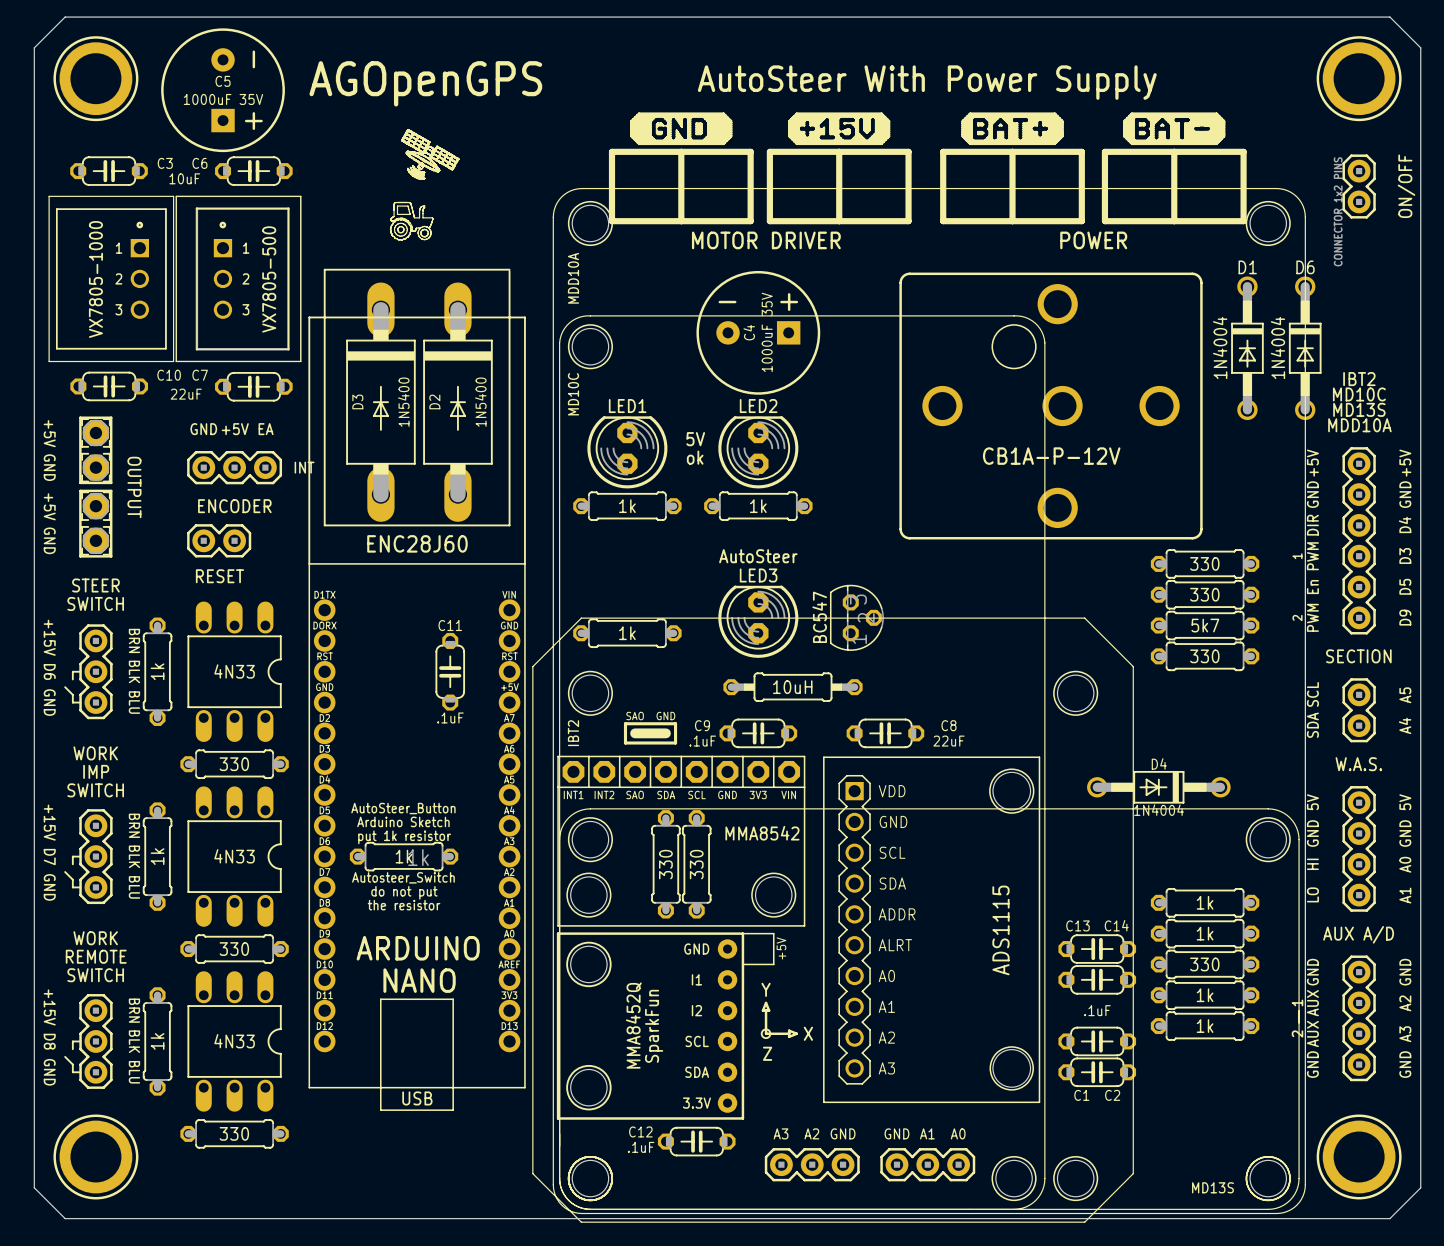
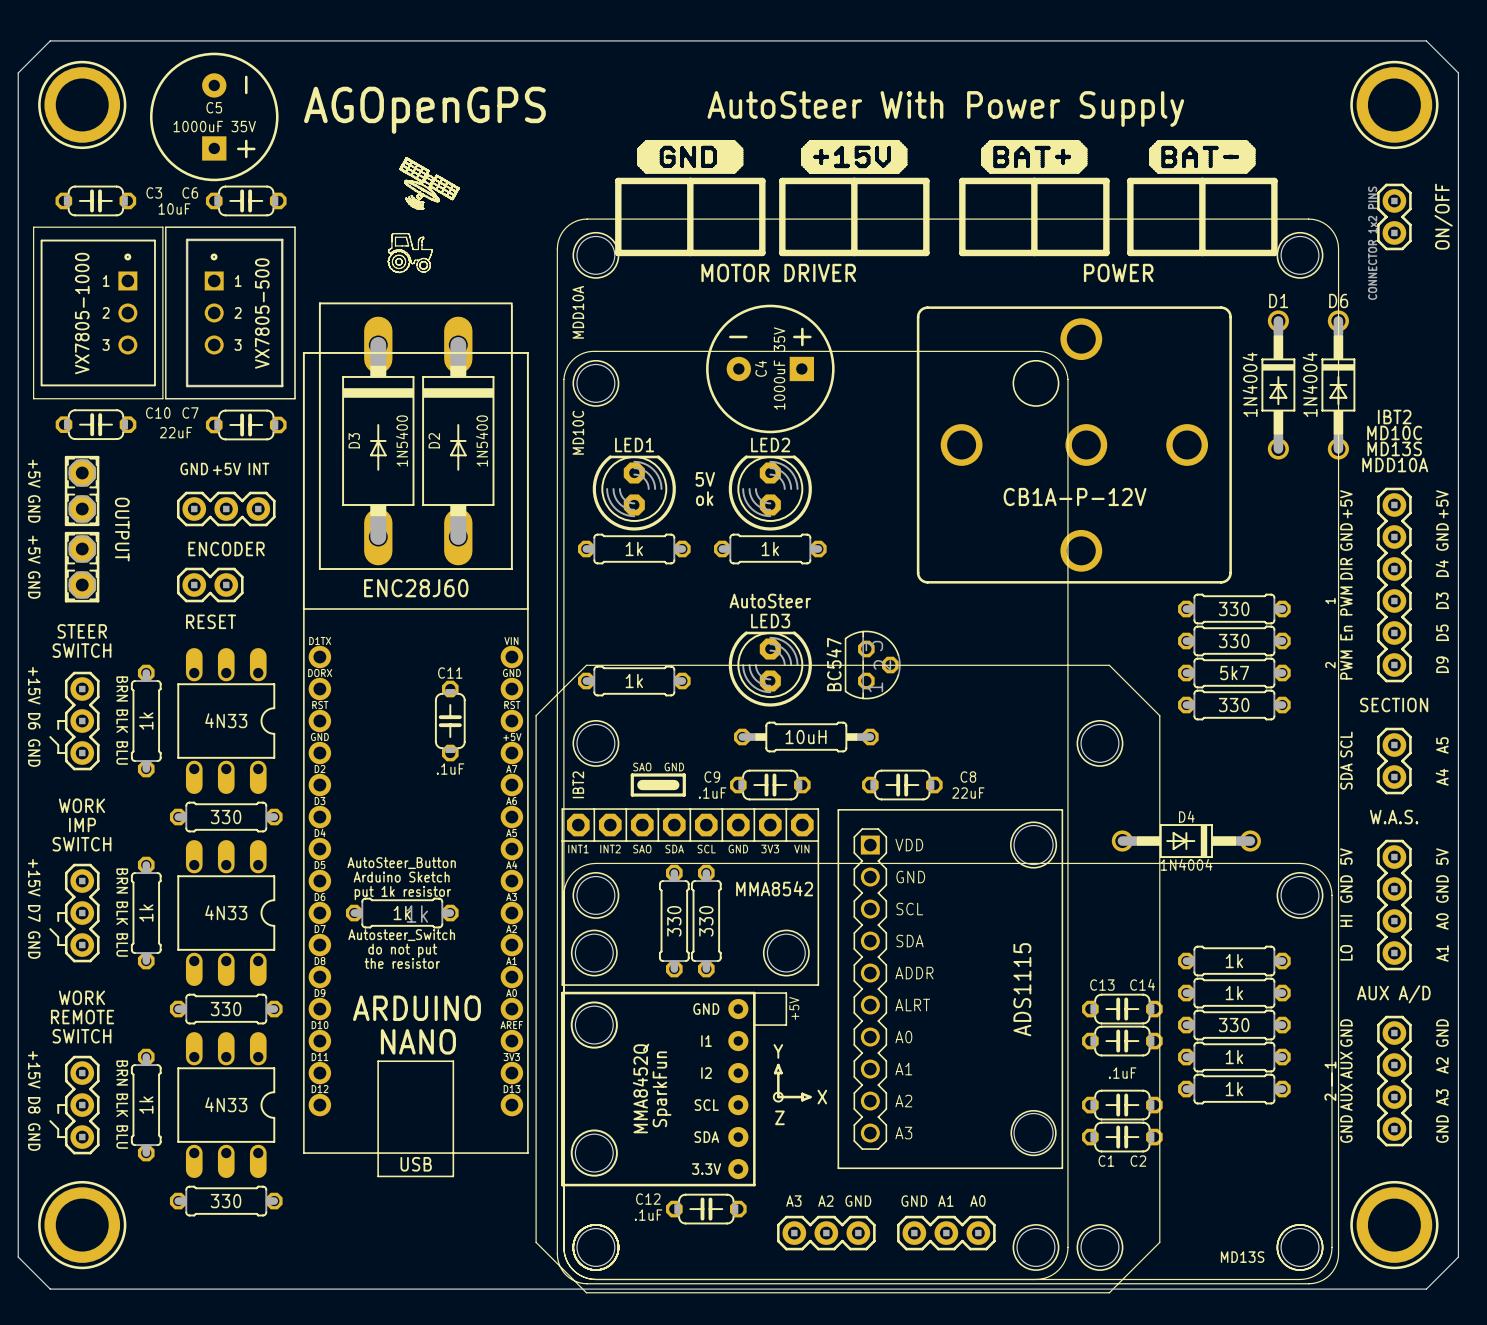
text: EA (266, 429) -> none
INT name position: INT (304, 467) -> INT (258, 468)

